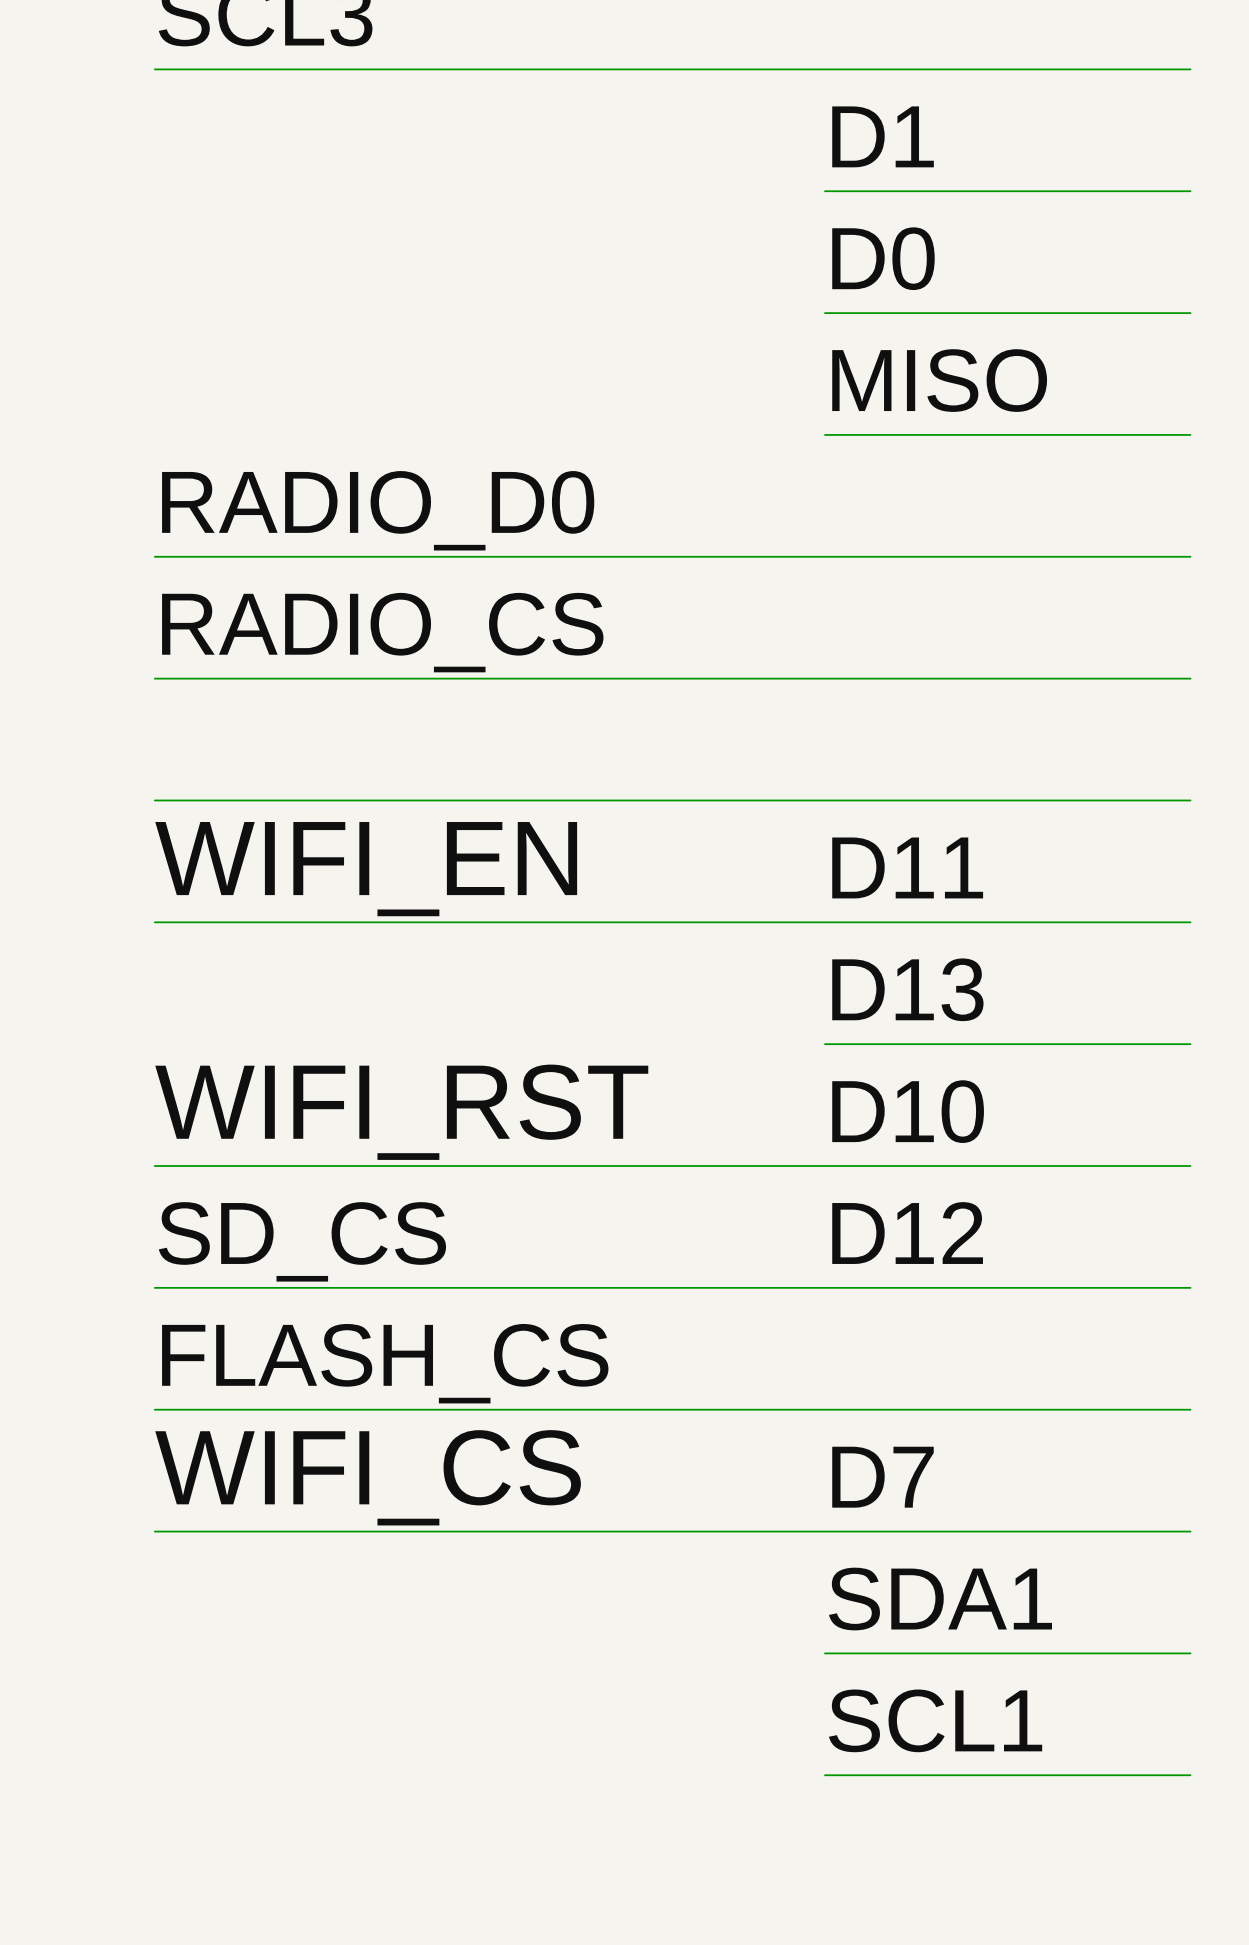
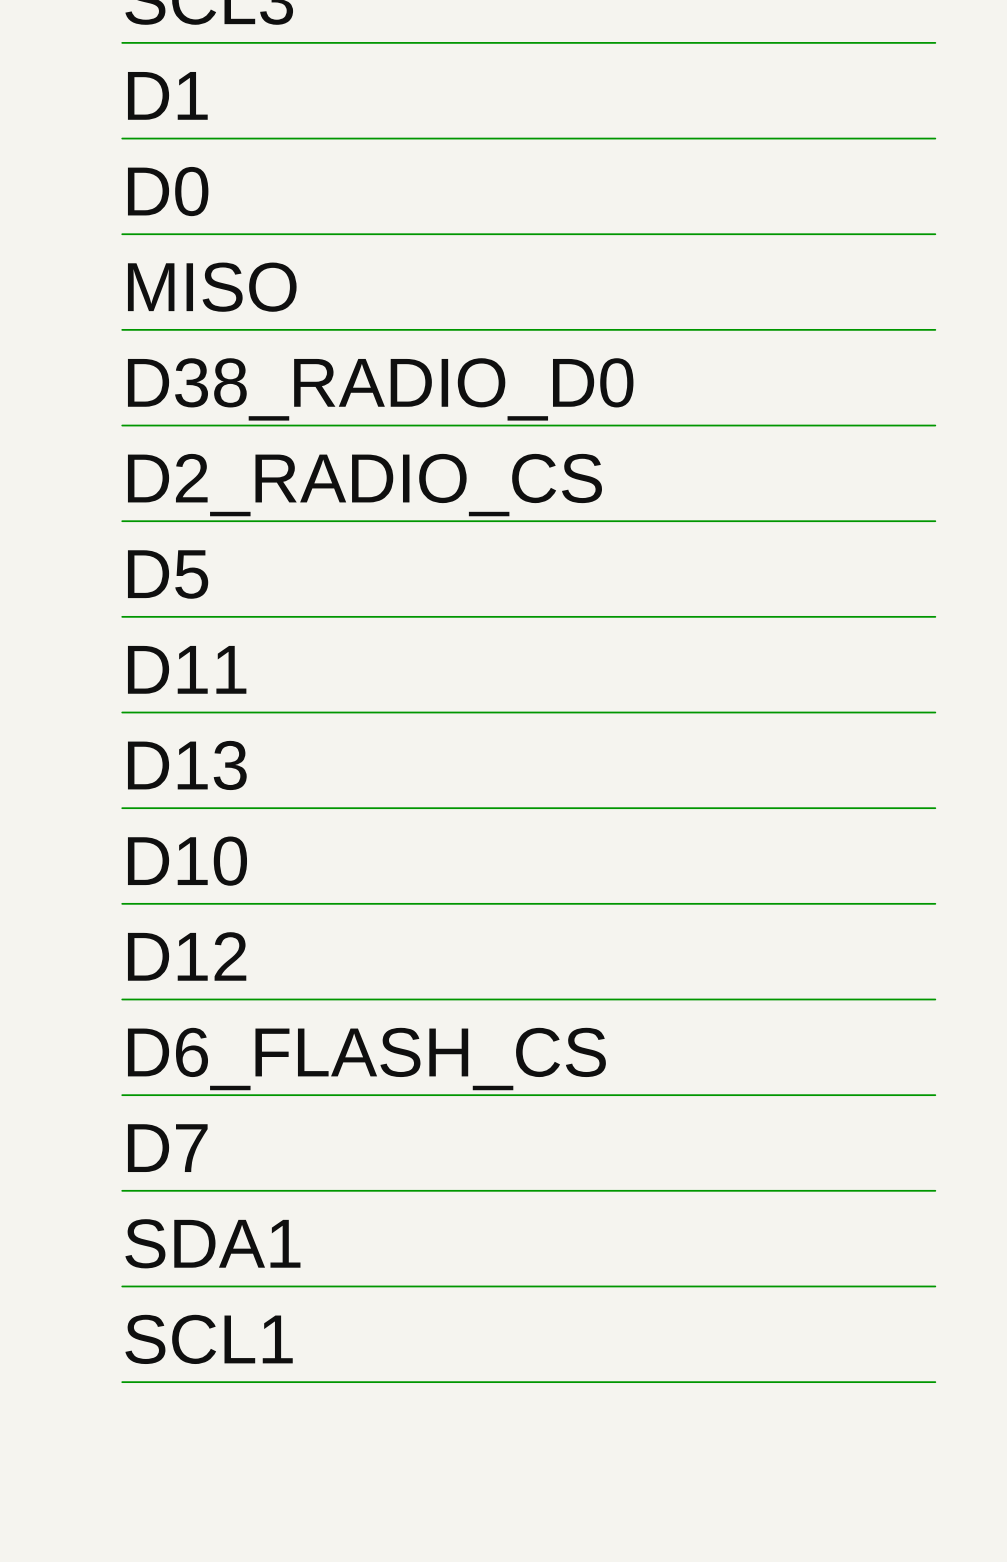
label position: D1 (883, 136) -> D1 (167, 95)
wire: none -> (122, 138) (648, 138)
label position: D0 (883, 258) -> D0 (168, 191)
wire: none -> (122, 234) (648, 234)
label position: MISO (939, 380) -> MISO (212, 287)
wire: none -> (122, 329) (648, 329)
label: RADIO_D0 (378, 510) -> D38_RADIO_D0 (380, 389)
label: RADIO_CS (382, 632) -> D2_RADIO_CS (364, 485)
label: none -> D5 (168, 574)
label: D11 (907, 867) -> none
label: WIFI_EN (366, 869) -> D11 (187, 669)
label position: D13 (907, 989) -> D13 (187, 765)
wire: none -> (122, 808) (648, 808)
label: D10 (908, 1111) -> none
label: WIFI_RST (401, 1112) -> D10 (187, 861)
label: D12 (907, 1233) -> none
label: SD_CS (302, 1241) -> D12 (187, 956)
label: FLASH_CS (385, 1363) -> D6_FLASH_CS (366, 1059)
label: WIFI_CS (368, 1477) -> D7 (167, 1148)
label: D7 (882, 1477) -> none
label position: SDA1 (940, 1599) -> SDA1 (212, 1243)
wire: none -> (122, 1286) (648, 1286)
label position: SCL1 (935, 1720) -> SCL1 (209, 1339)
wire: none -> (122, 1382) (648, 1382)

